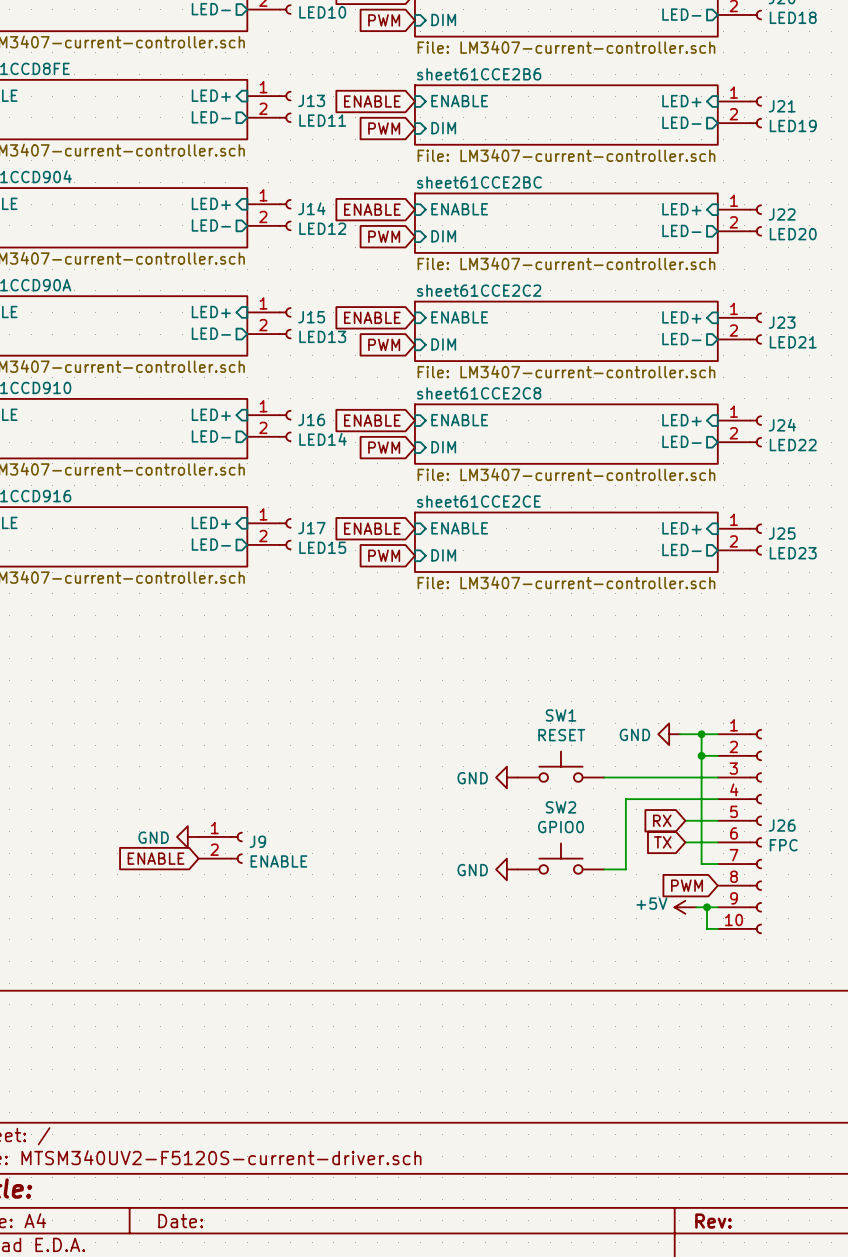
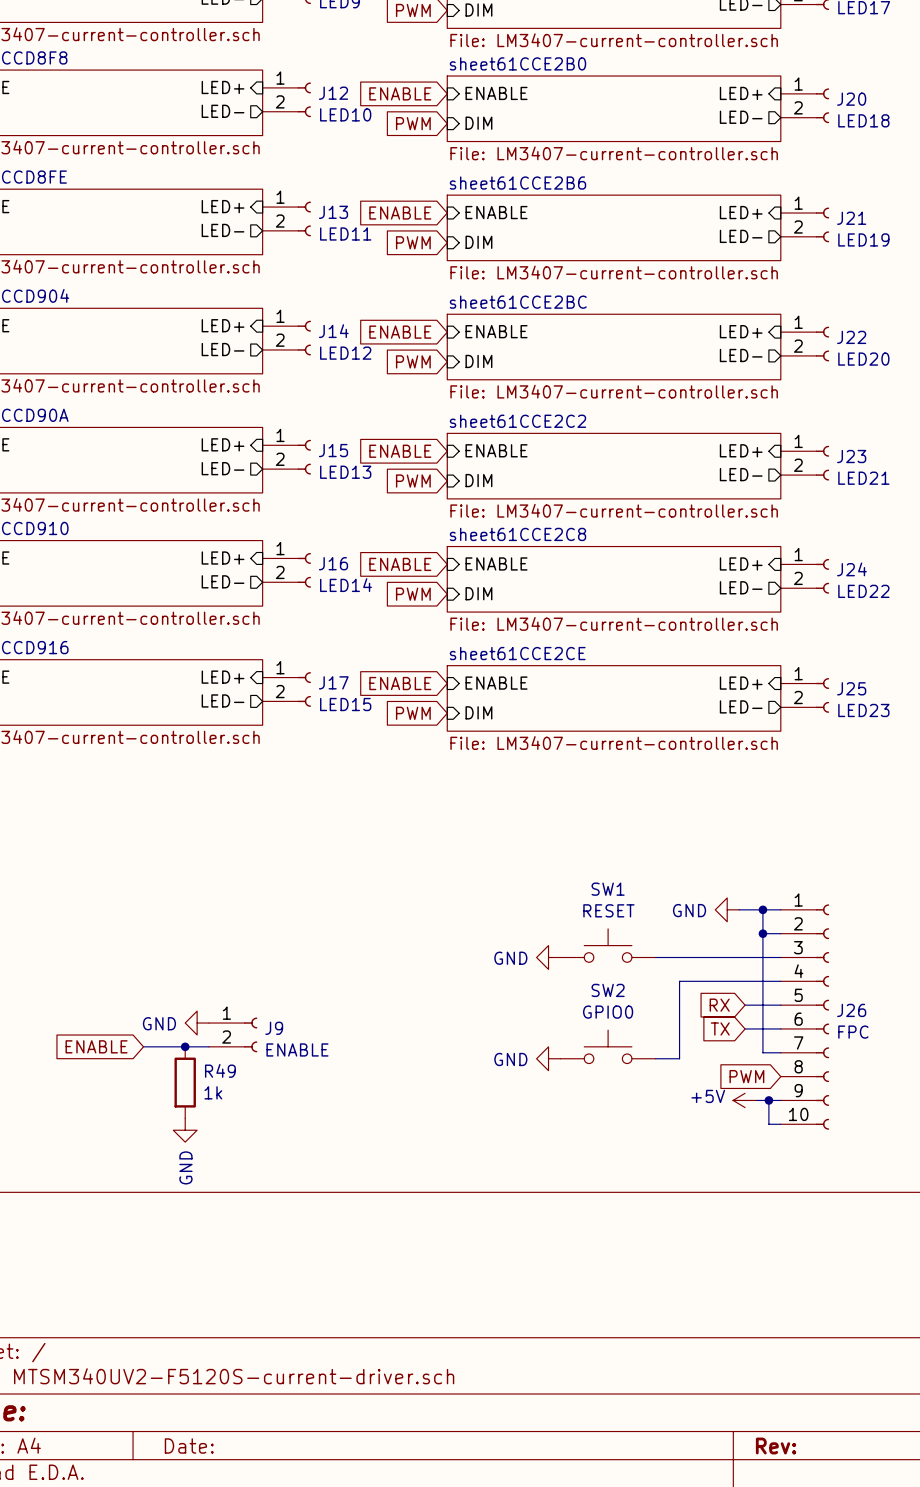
wire: none -> (143, 1046) (209, 1046)
global label position: ENABLE (156, 858) -> ENABLE (96, 1046)
junction: none -> (185, 1046)
R49: none -> 1k (185, 1082)
power symbol: none -> GND (185, 1130)

